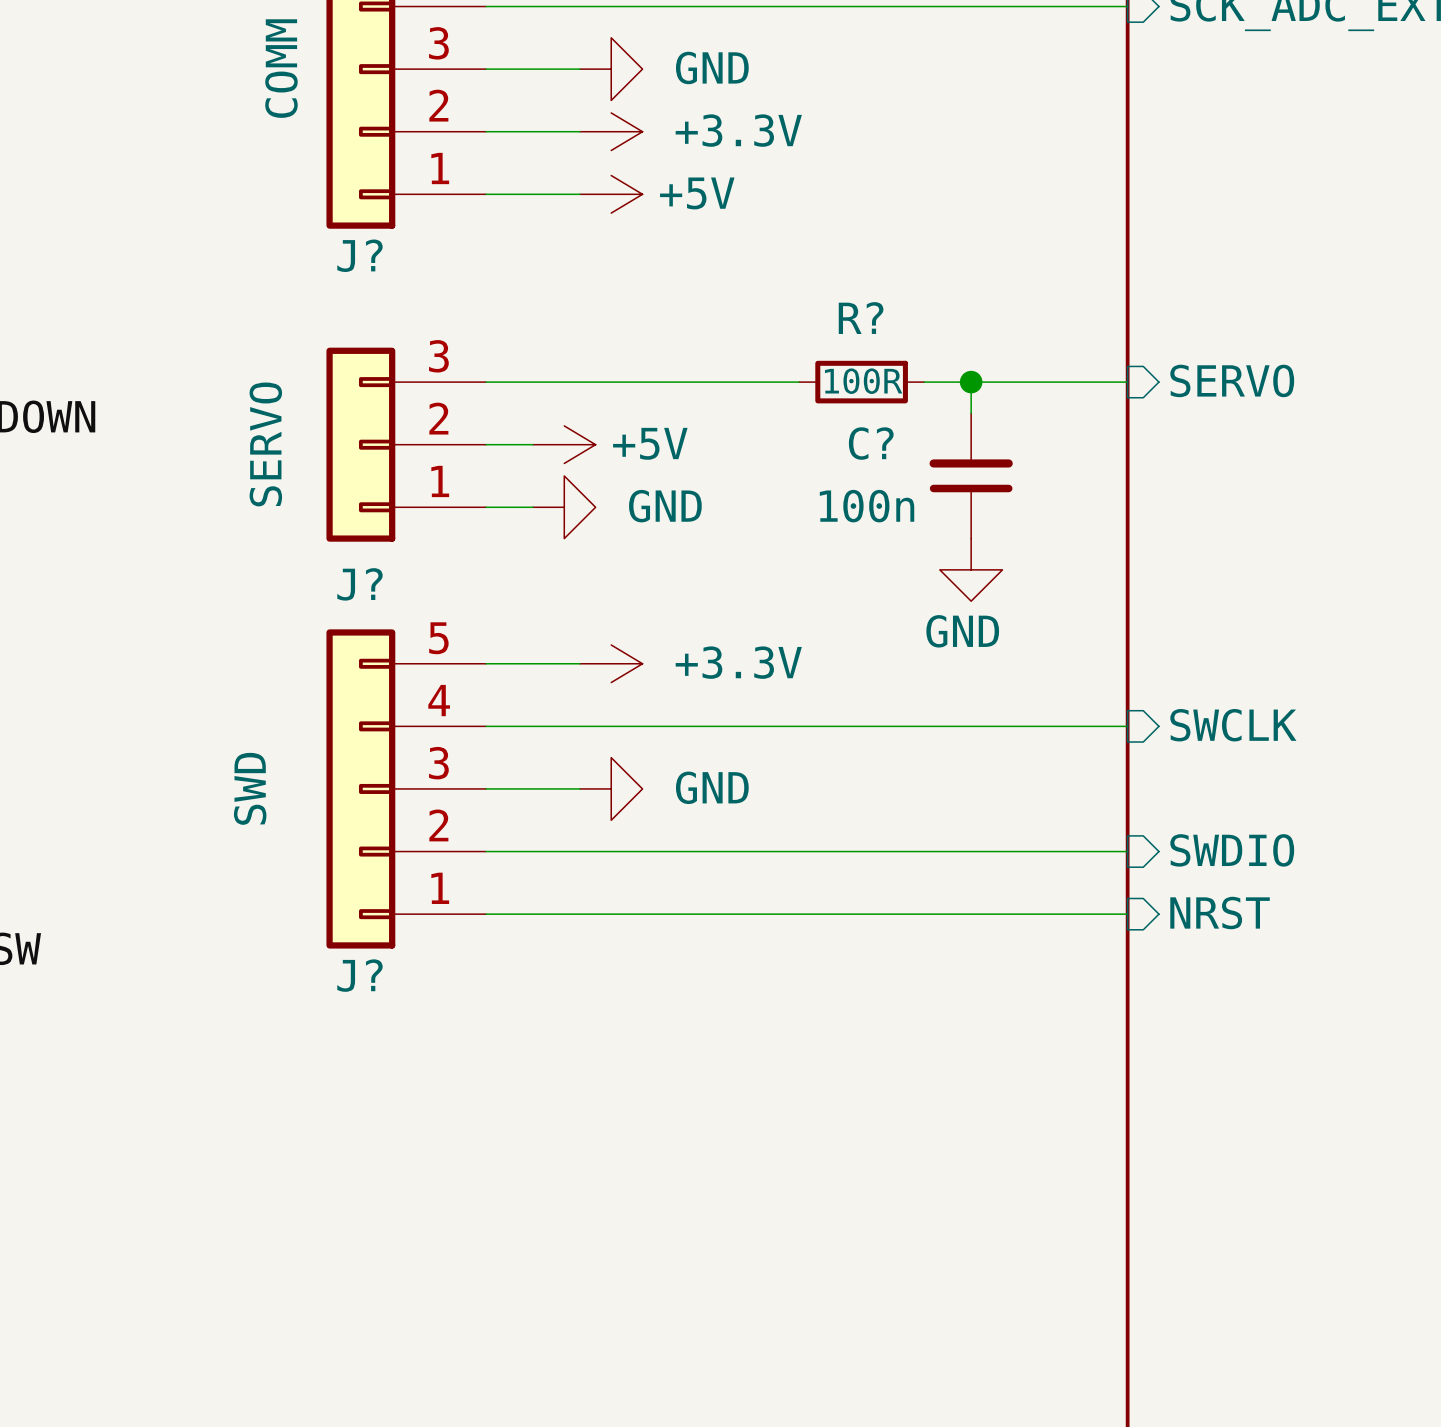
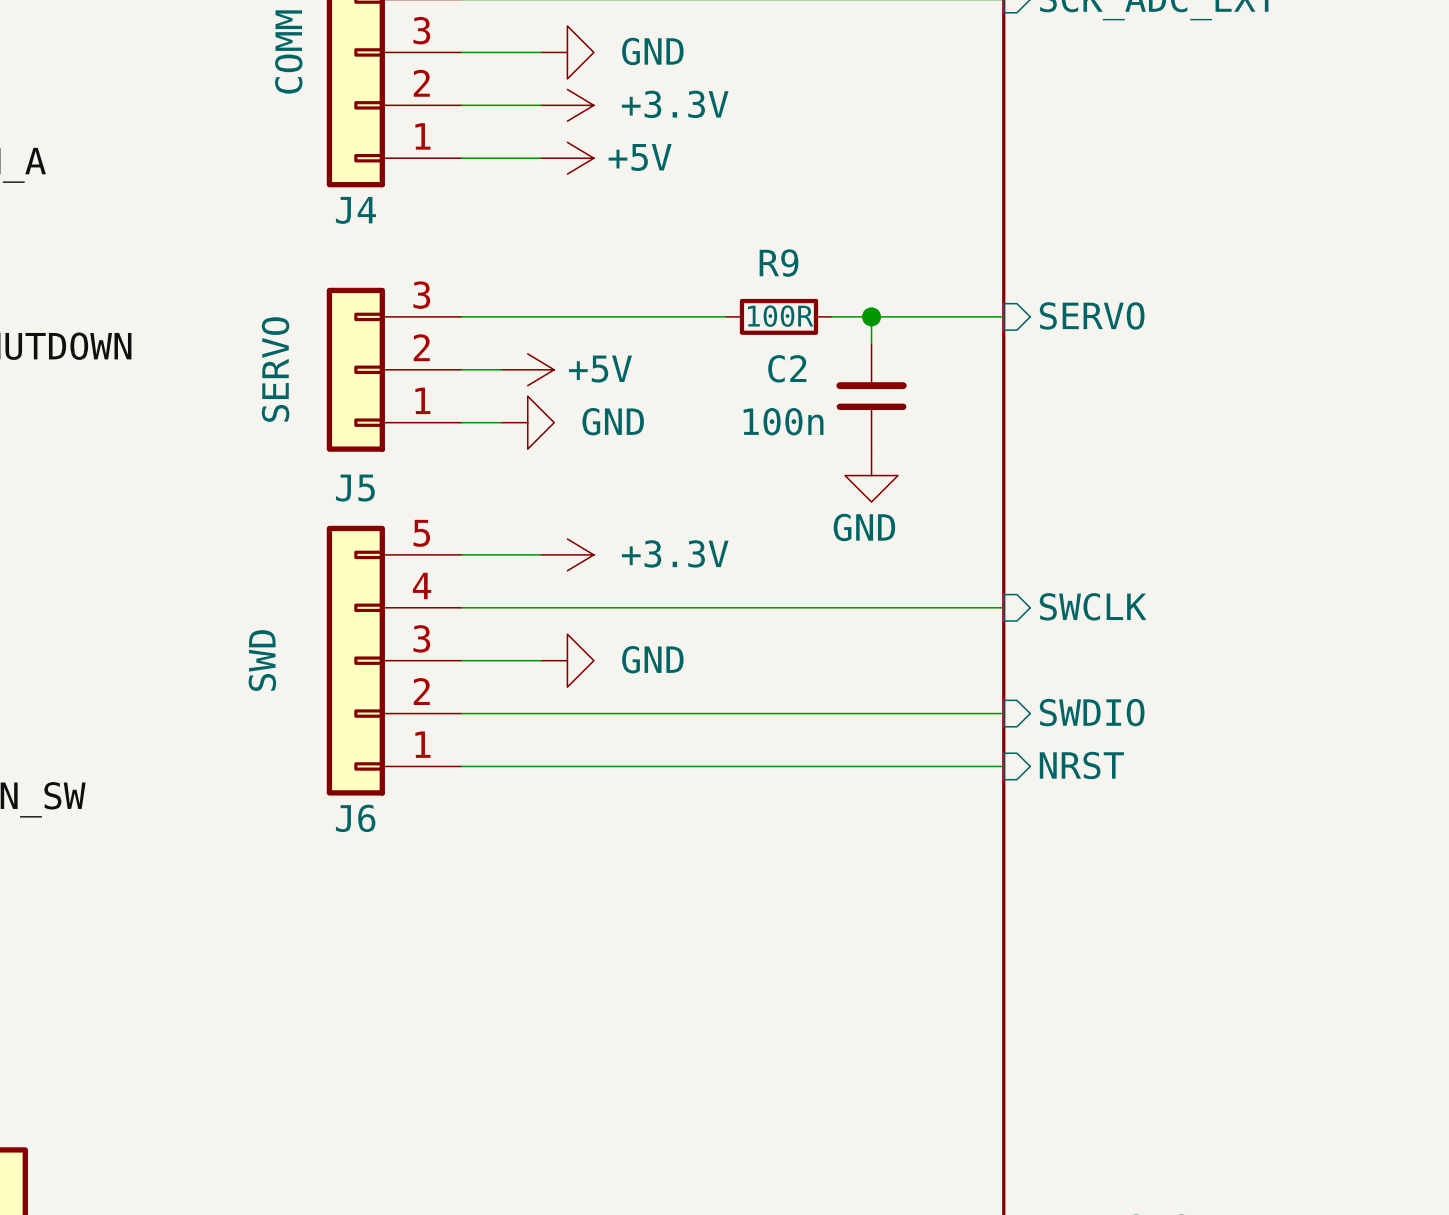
J? name: J? (359, 255) -> J4 (355, 210)
R? name: R? (861, 318) -> R9 (779, 263)
C? name: C? (871, 443) -> C2 (787, 368)
J? name: J? (359, 584) -> J5 (355, 488)
J? name: J? (359, 975) -> J6 (355, 818)

